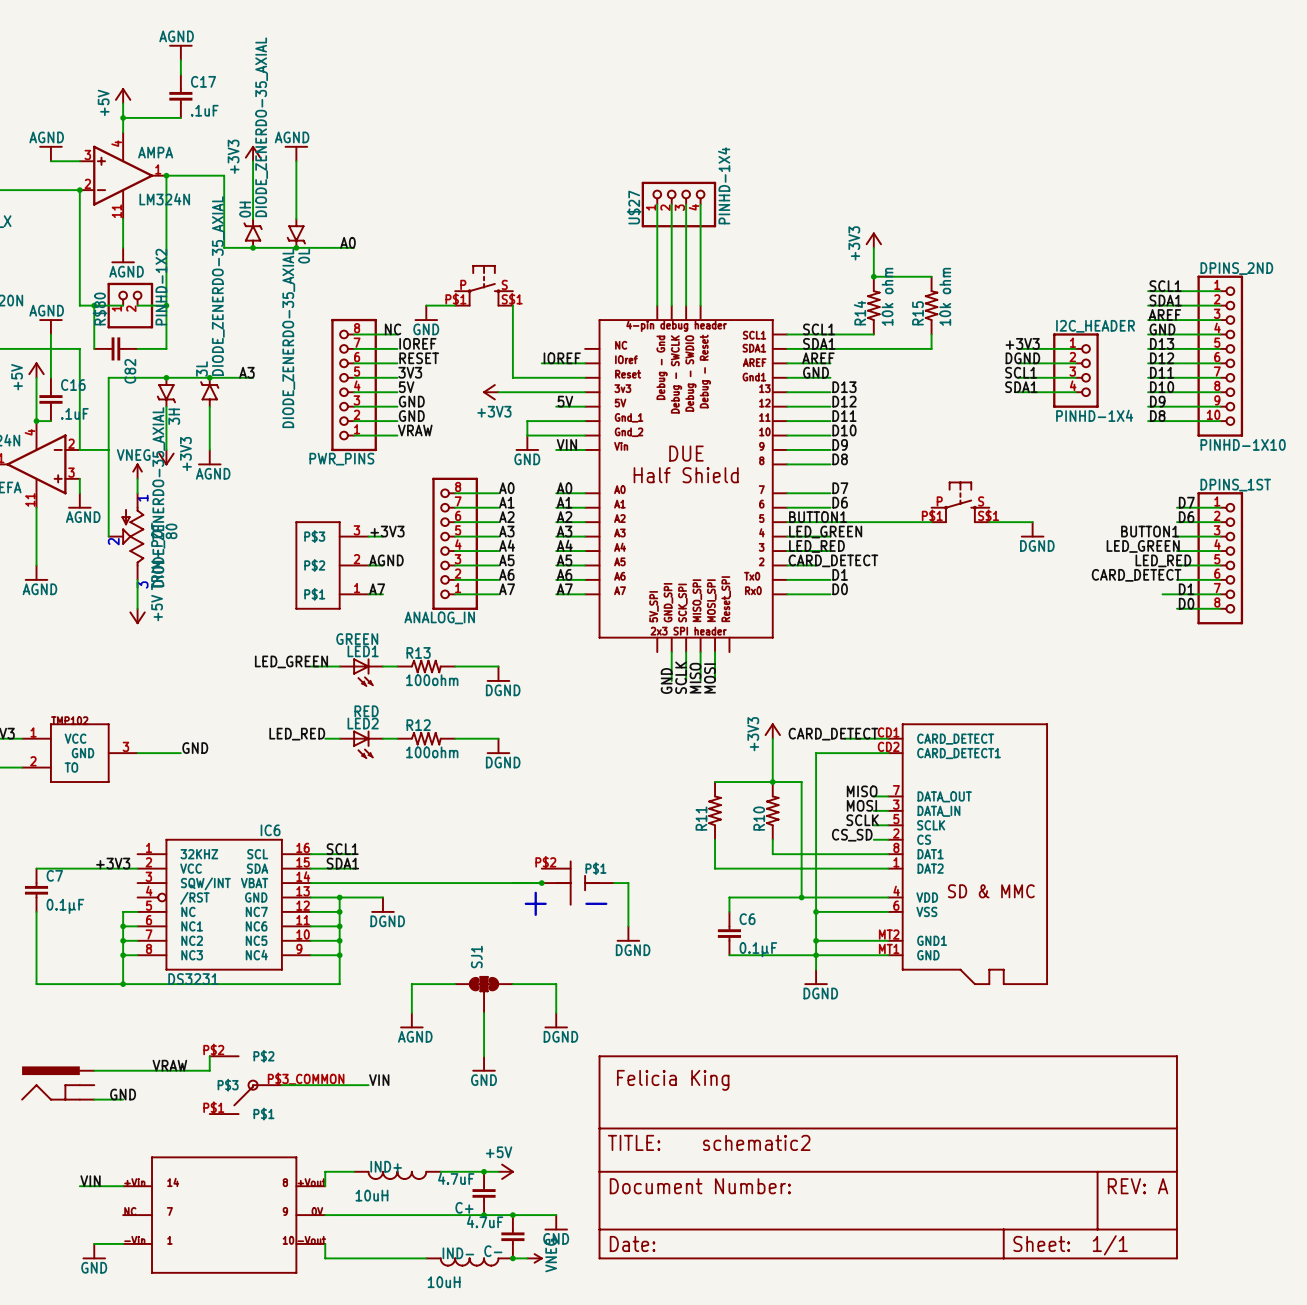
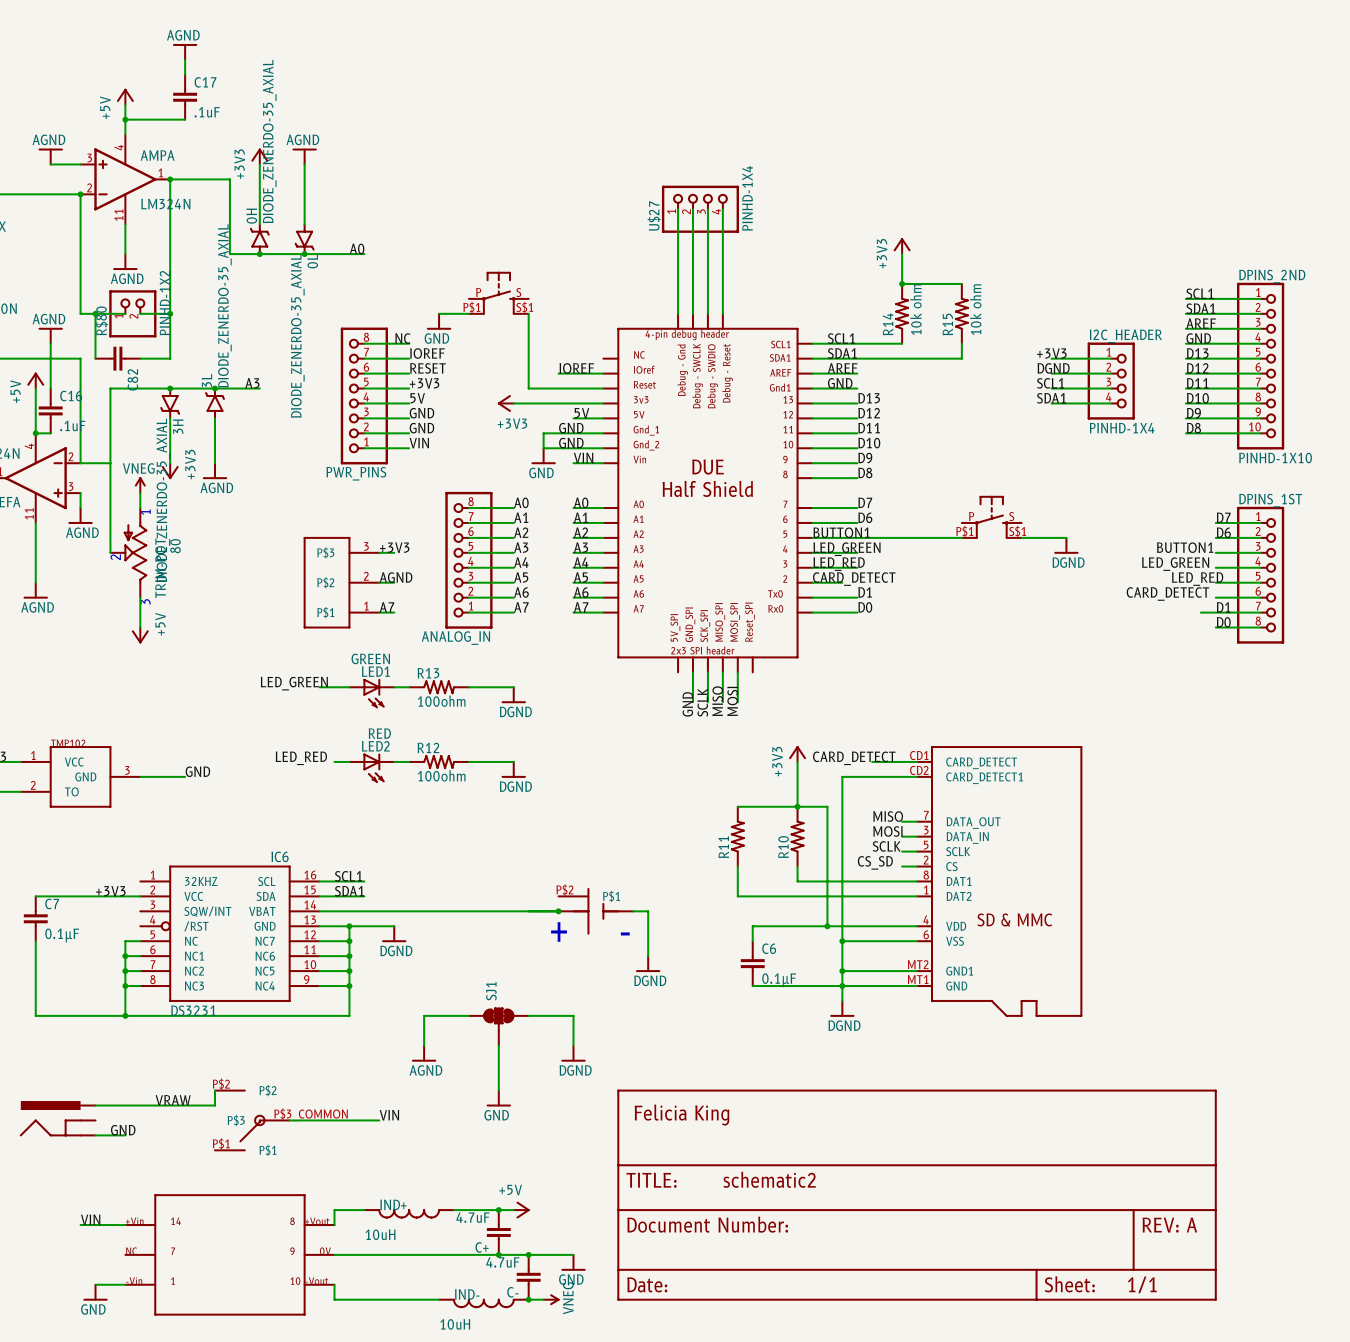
label: 3V3 (410, 372) -> +3V3 (424, 383)
label: none -> GND (571, 428)
label: VRAW (415, 430) -> VIN (419, 443)
label: none -> GND (571, 443)

